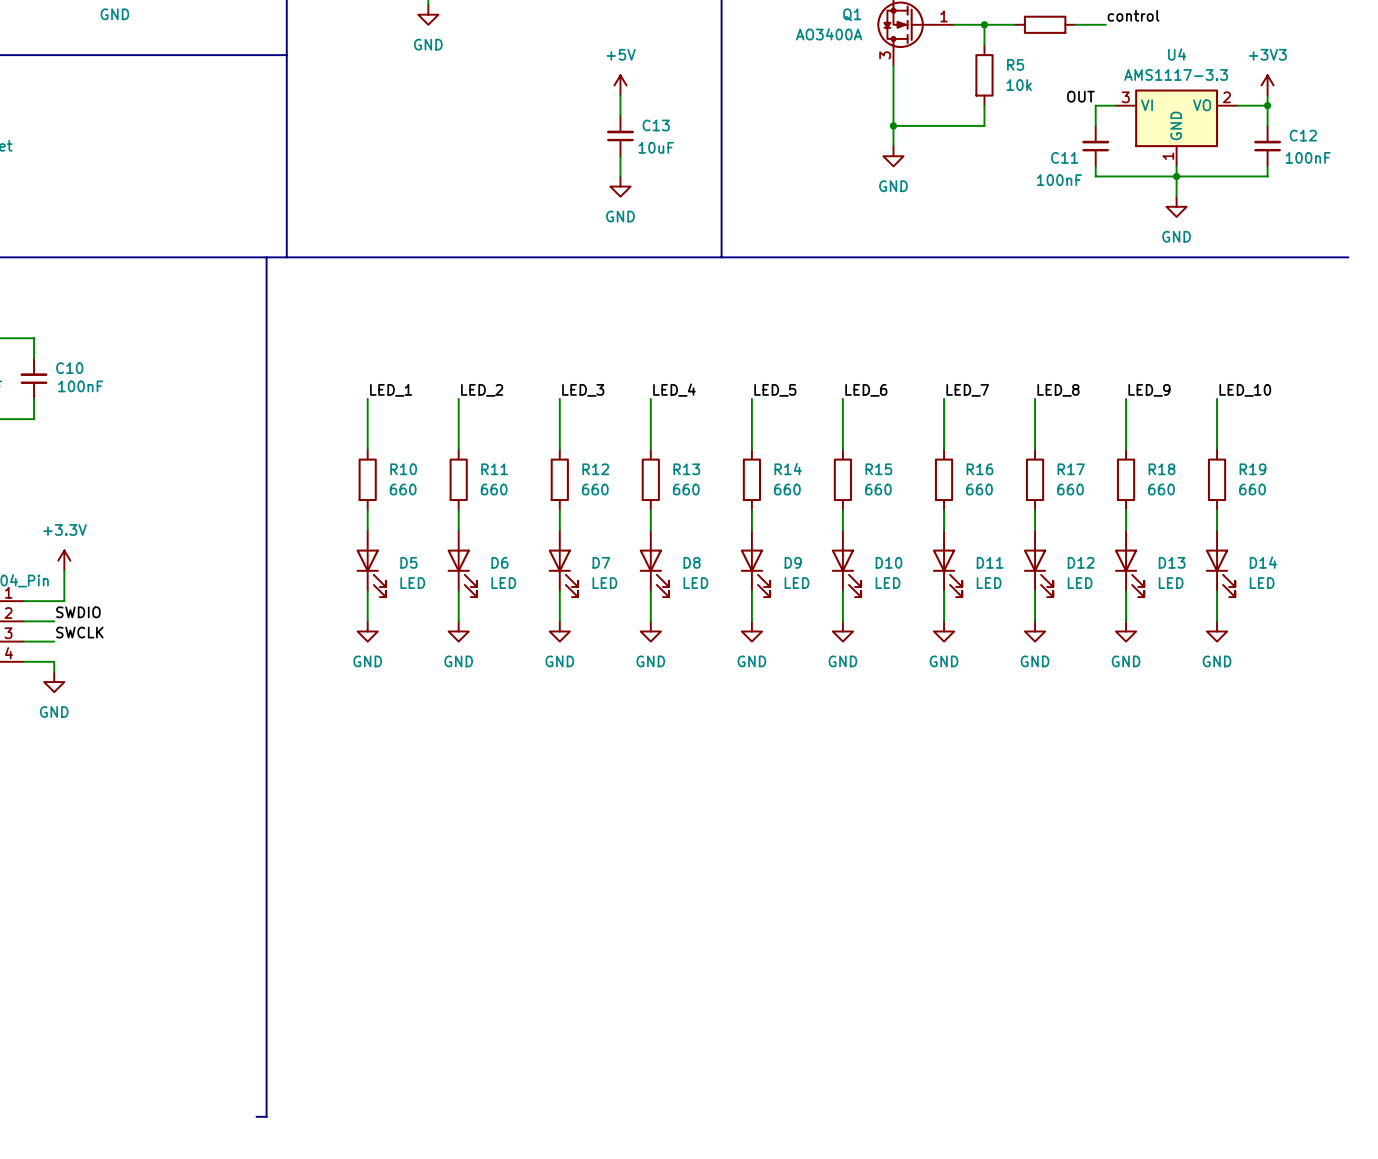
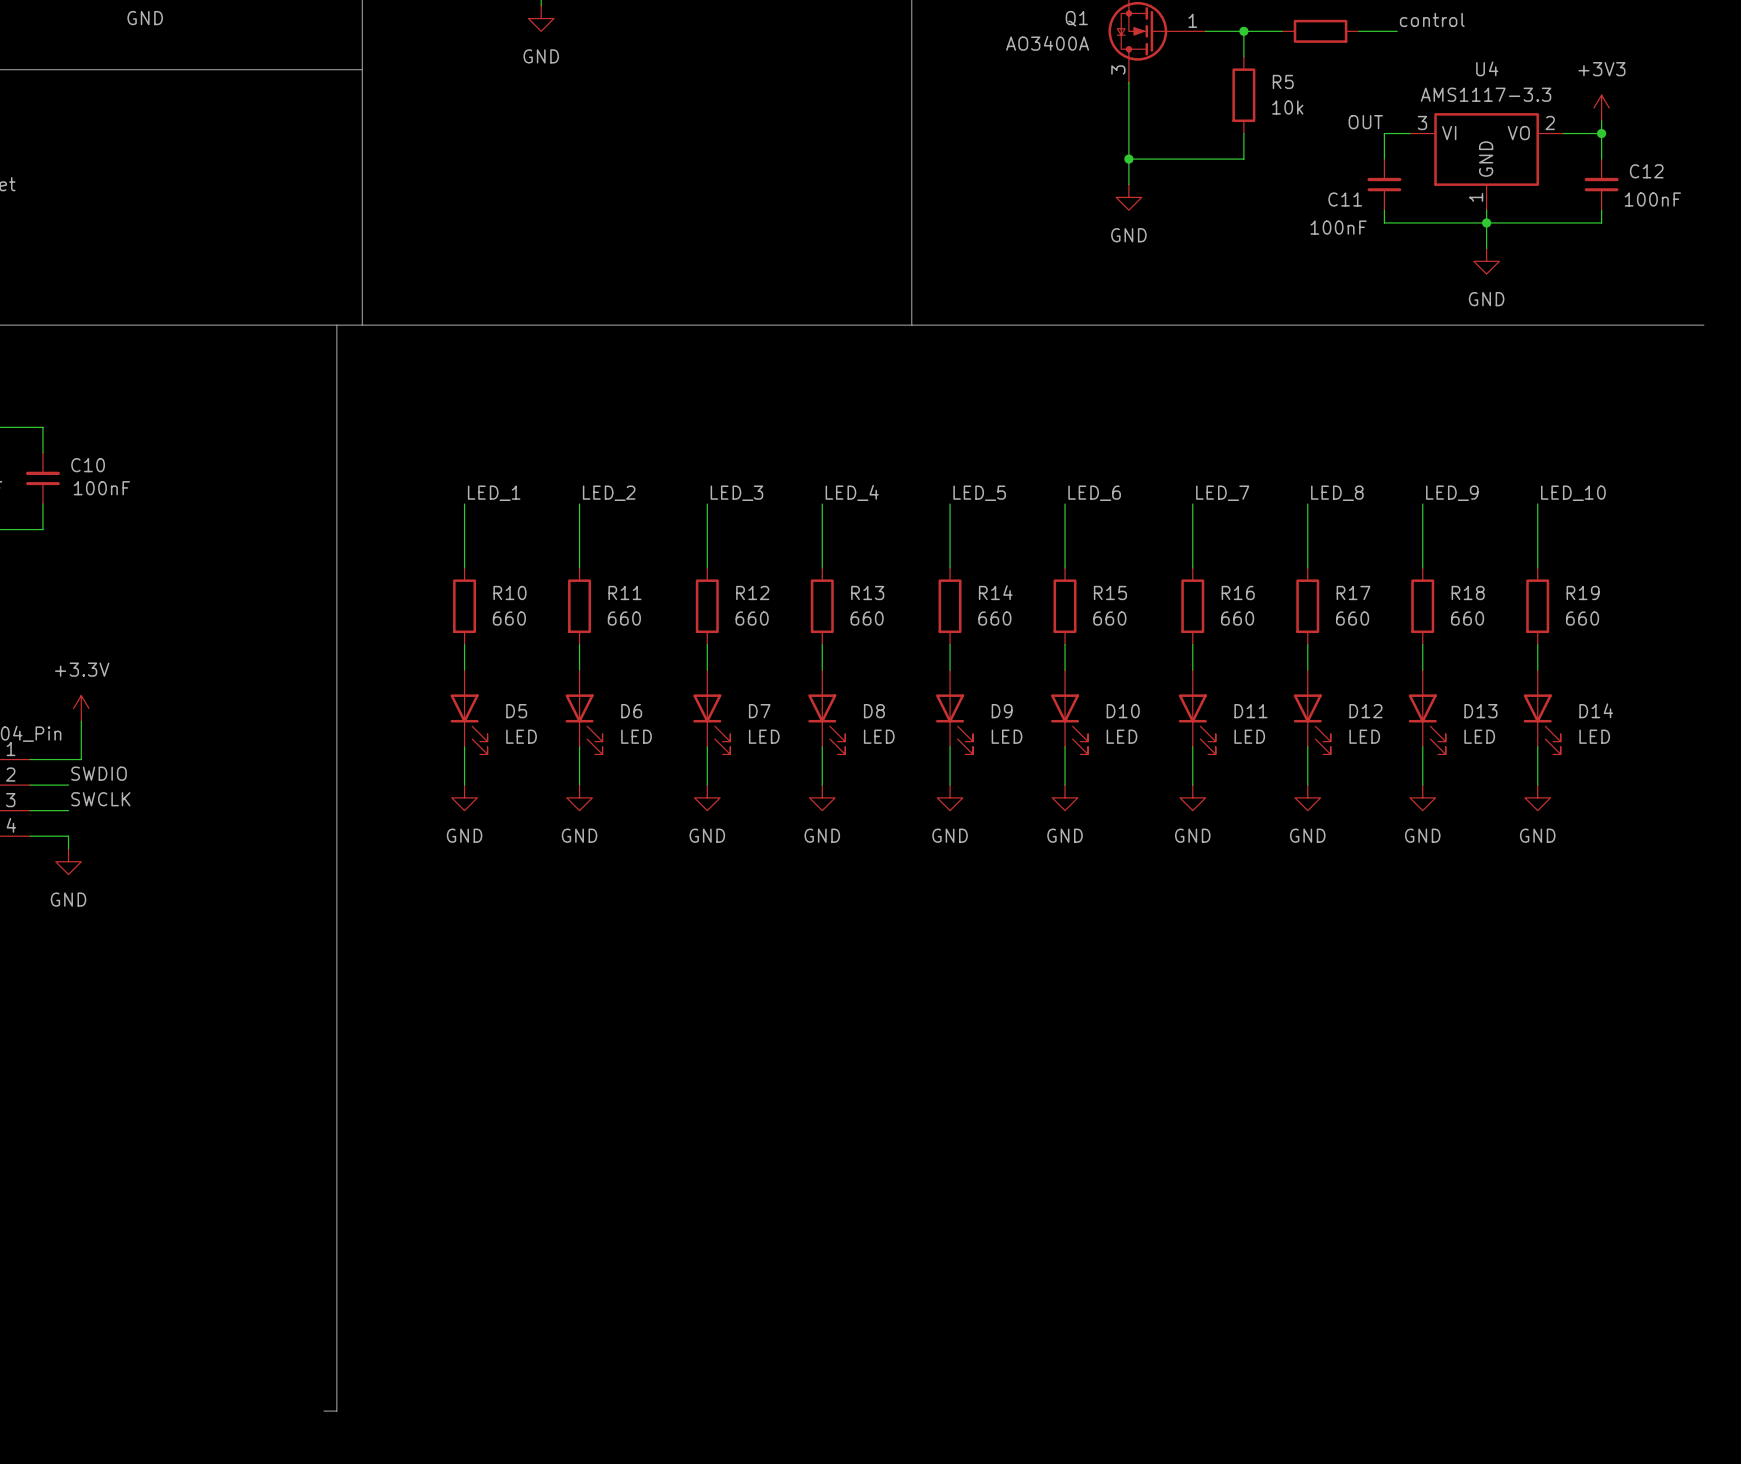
power symbol: +5V (620, 85) -> none
wire: (620, 95) (620, 115) -> none
C13: 10uF (620, 136) -> none
wire: (620, 156) (620, 176) -> none
power symbol: GND (620, 186) -> none

